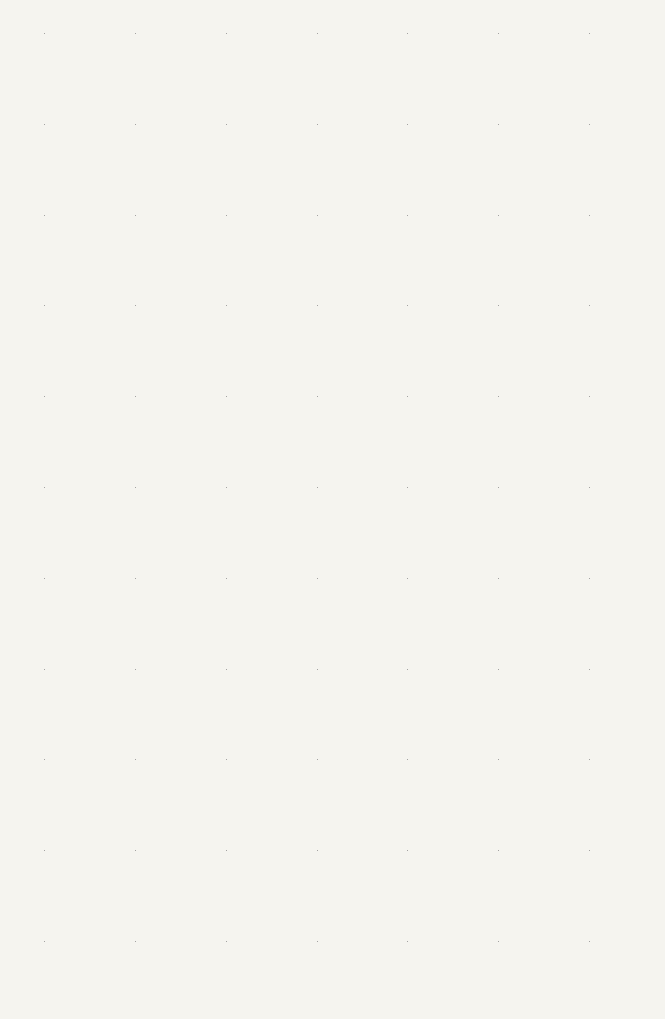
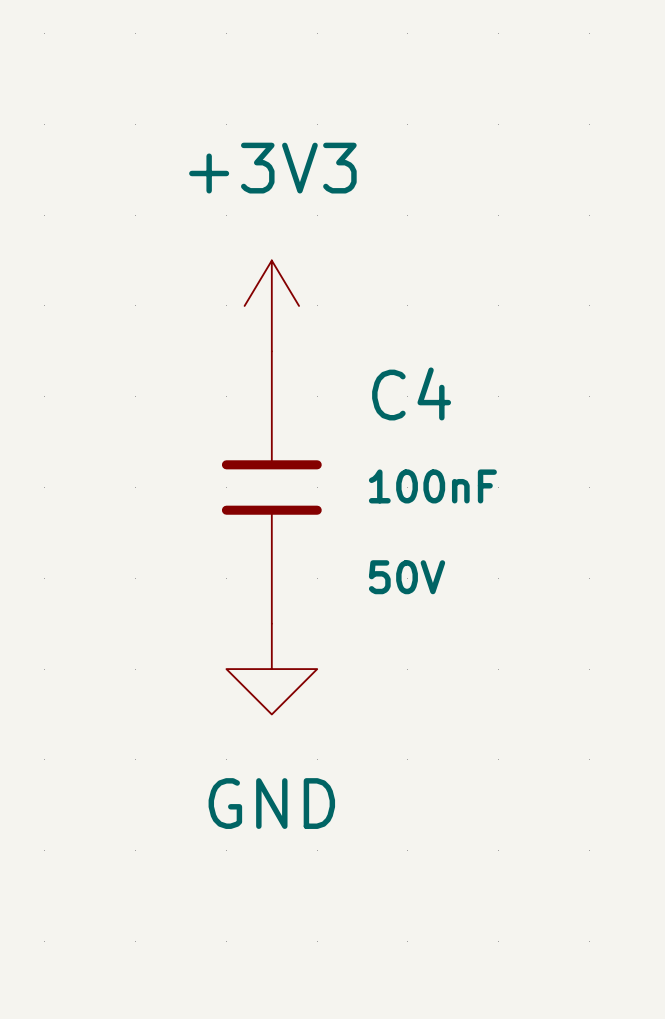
power symbol: none -> +3V3 (271, 305)
C4: none -> 100nF (271, 487)
power symbol: none -> GND (271, 669)

